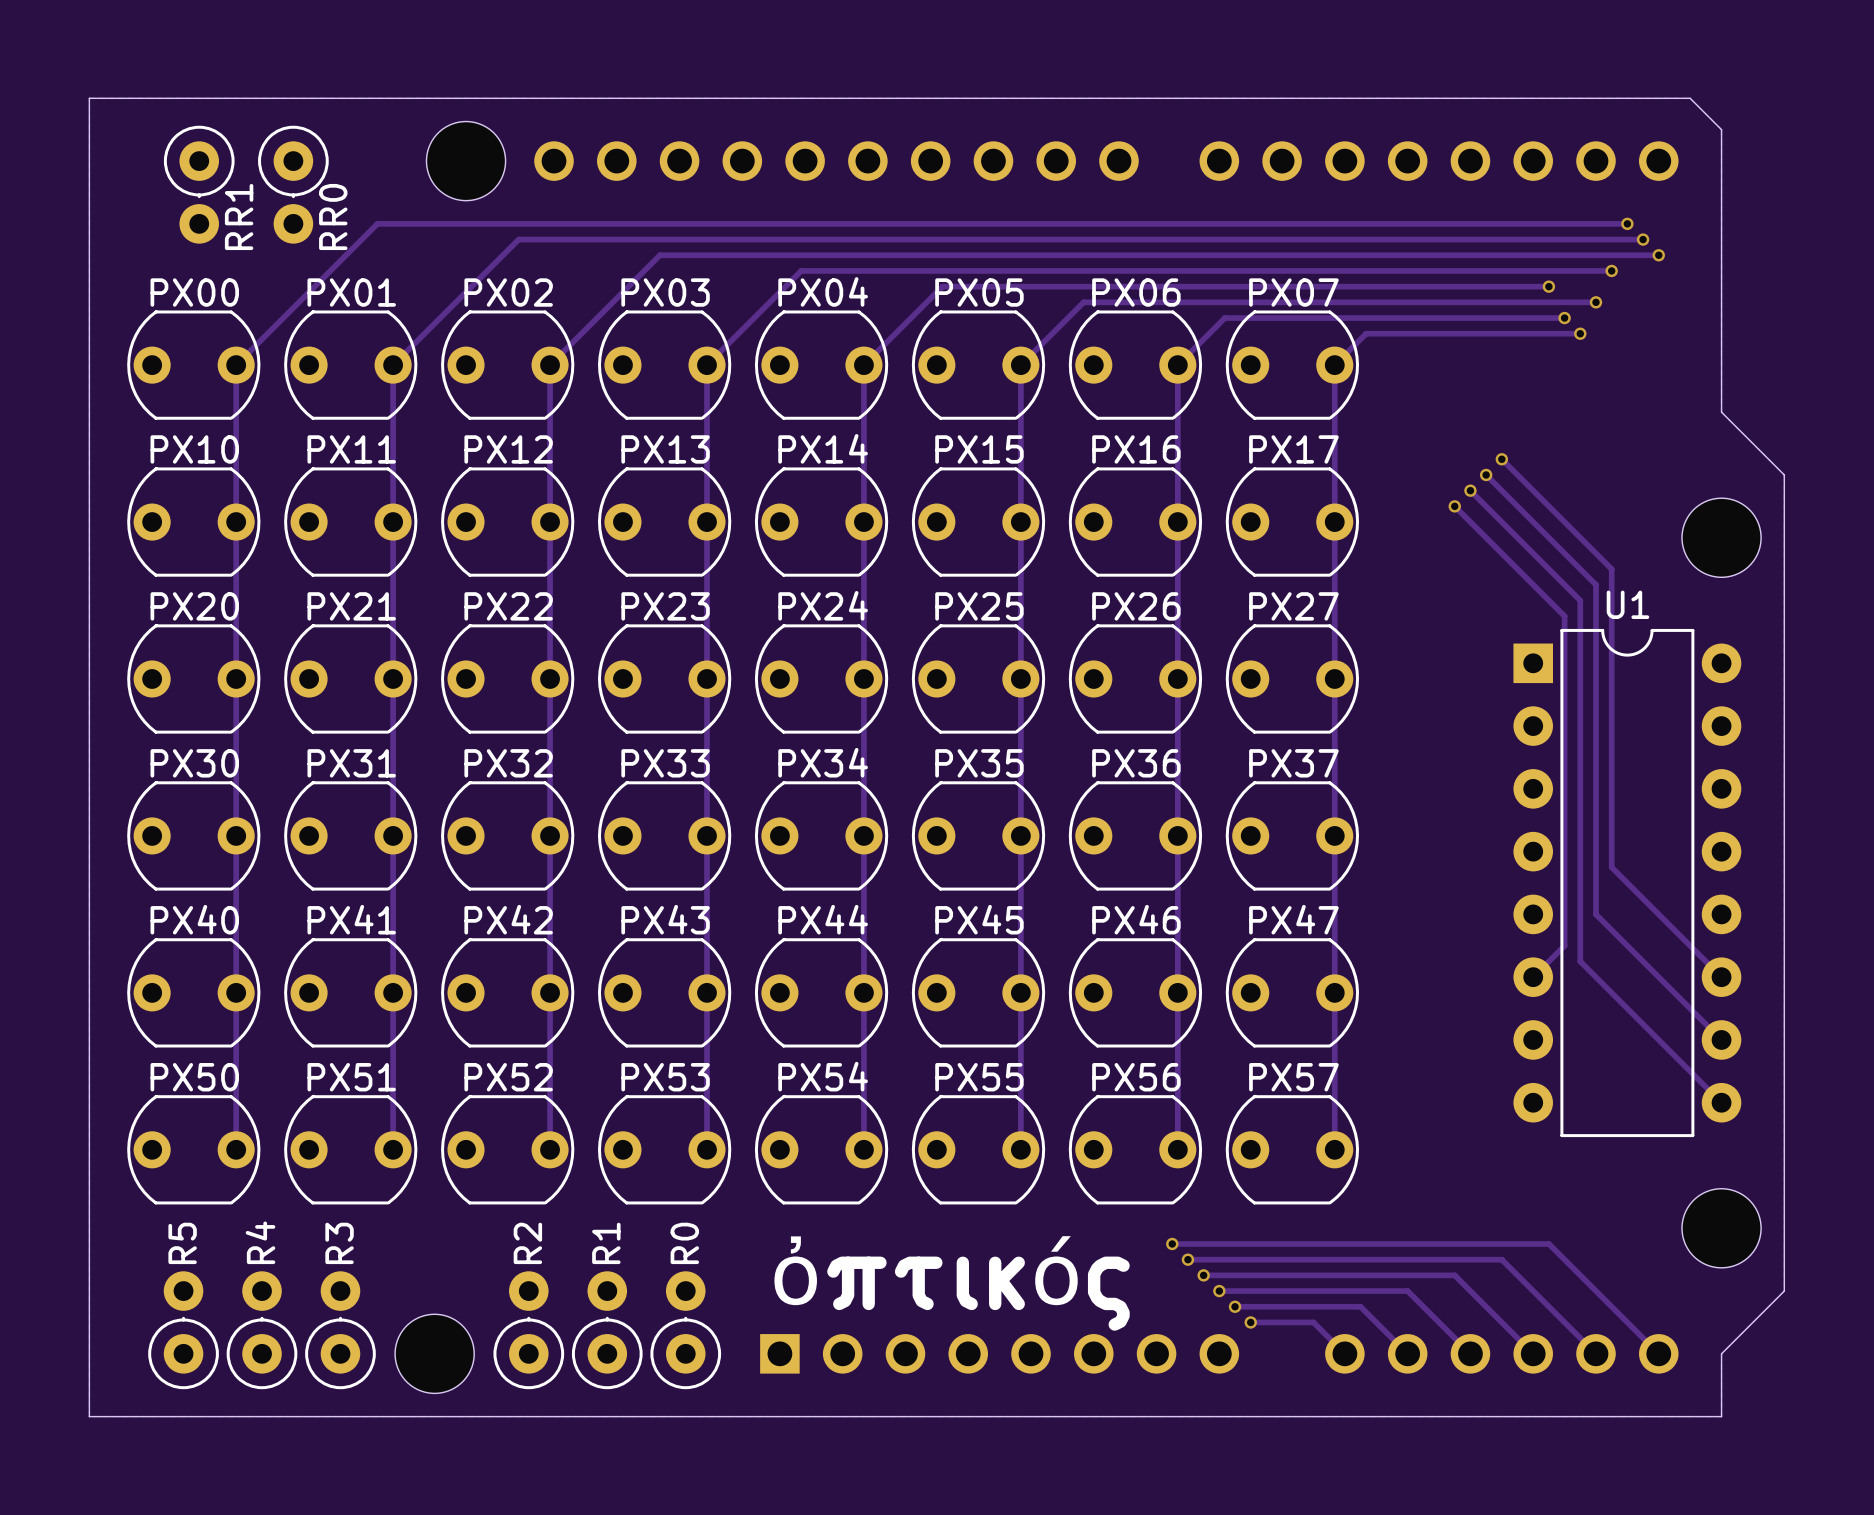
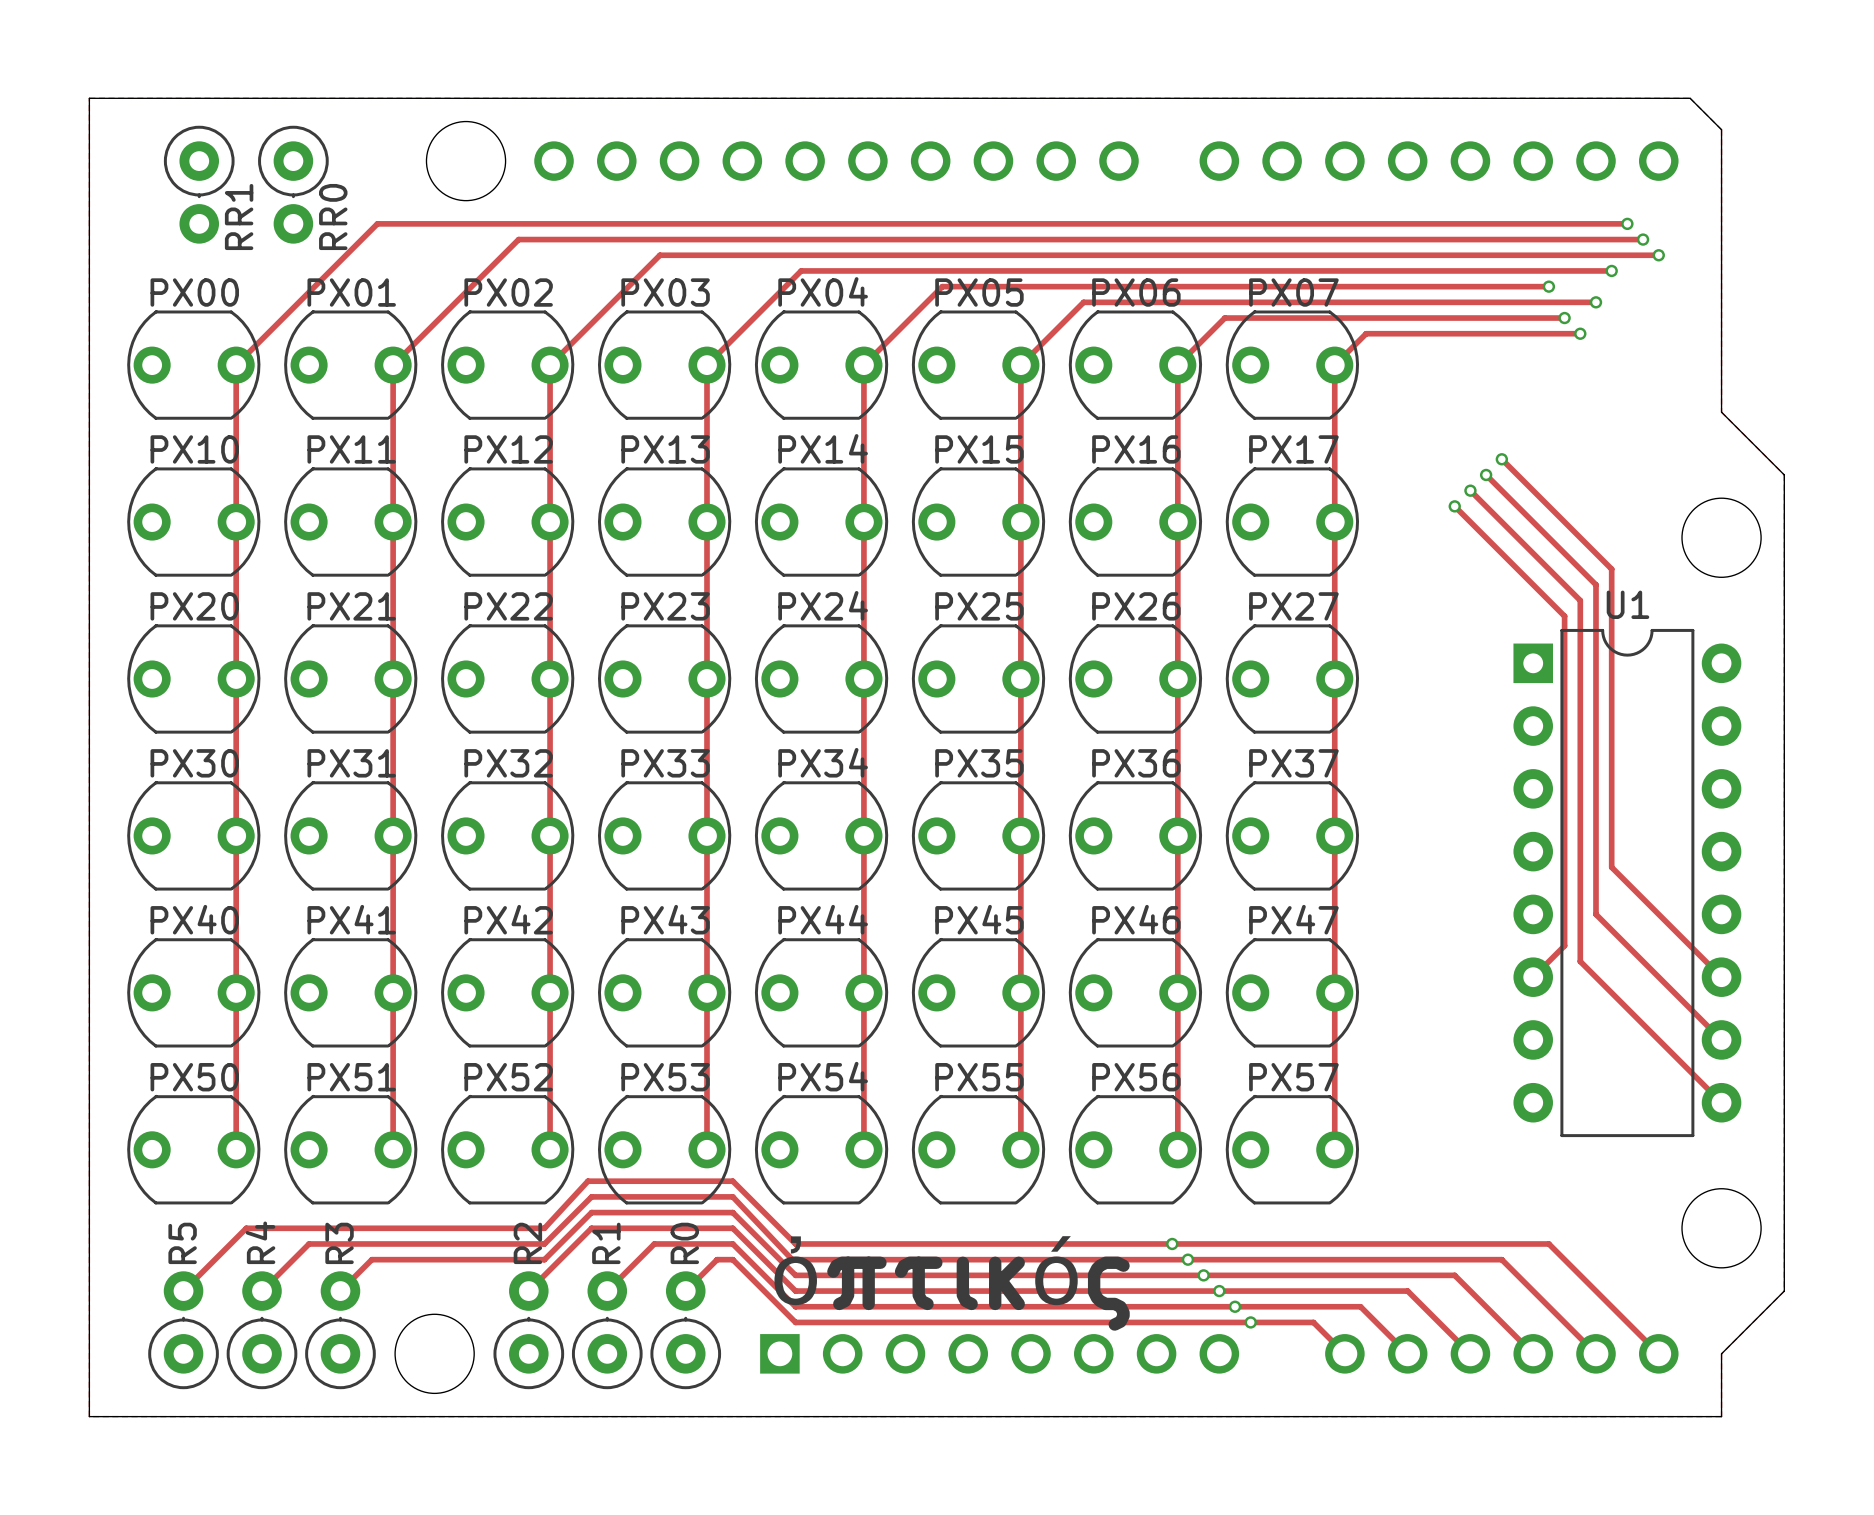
track: none -> (1172, 1243) (795, 1243) (732, 1181) (587, 1181) (544, 1228) (246, 1228) (183, 1291)
track: none -> (1187, 1259) (792, 1259) (732, 1196) (591, 1196) (544, 1243) (309, 1243) (262, 1291)
track: none -> (1203, 1275) (795, 1275) (732, 1212) (591, 1212) (544, 1259) (371, 1259) (340, 1291)
track: none -> (528, 1291) (591, 1228) (732, 1228) (795, 1291) (1219, 1291)
track: none -> (607, 1291) (654, 1243) (732, 1243) (795, 1306) (1235, 1306)
track: none -> (685, 1291) (717, 1259) (732, 1259) (795, 1322) (1250, 1322)

